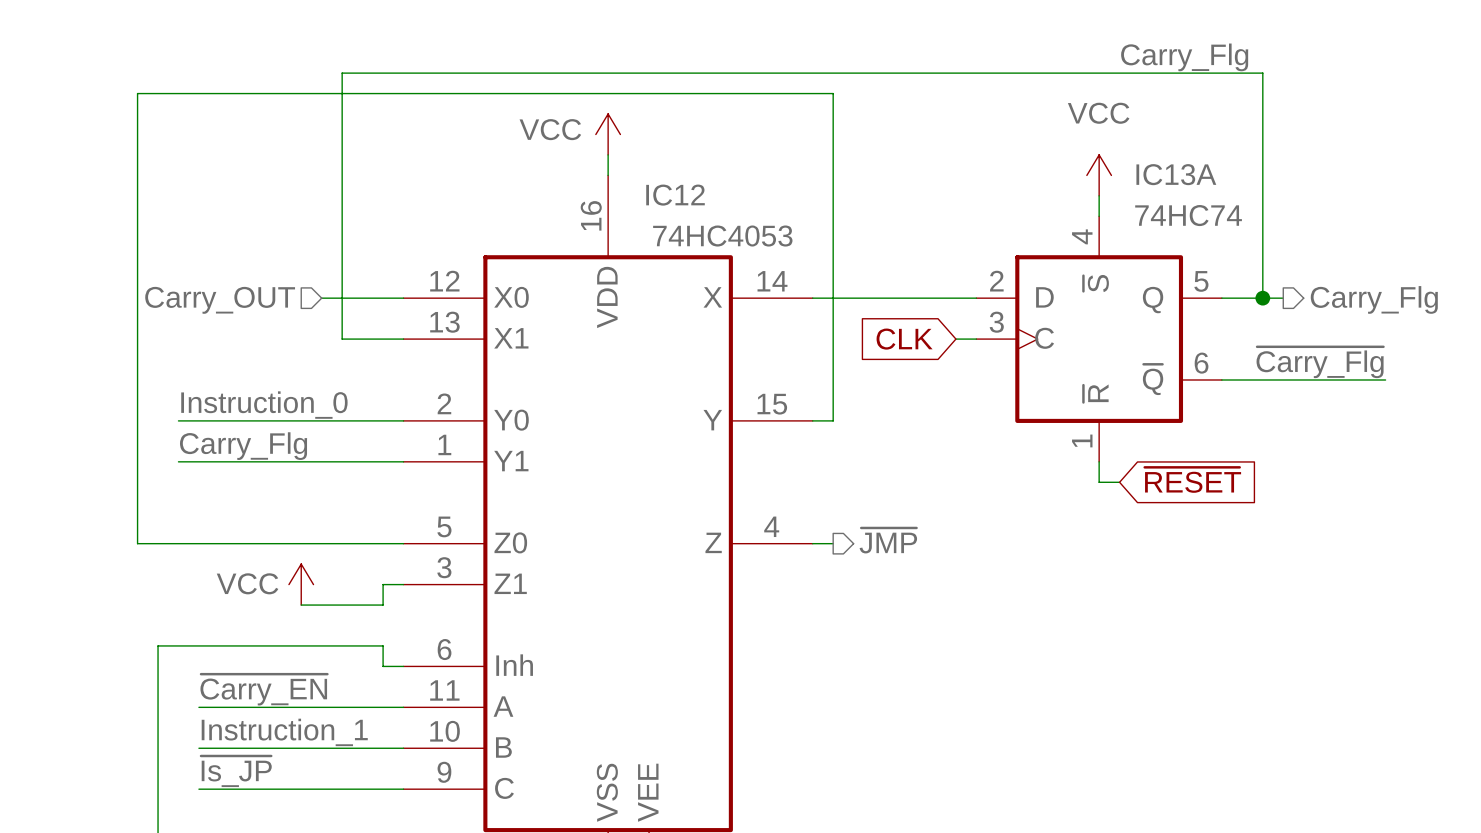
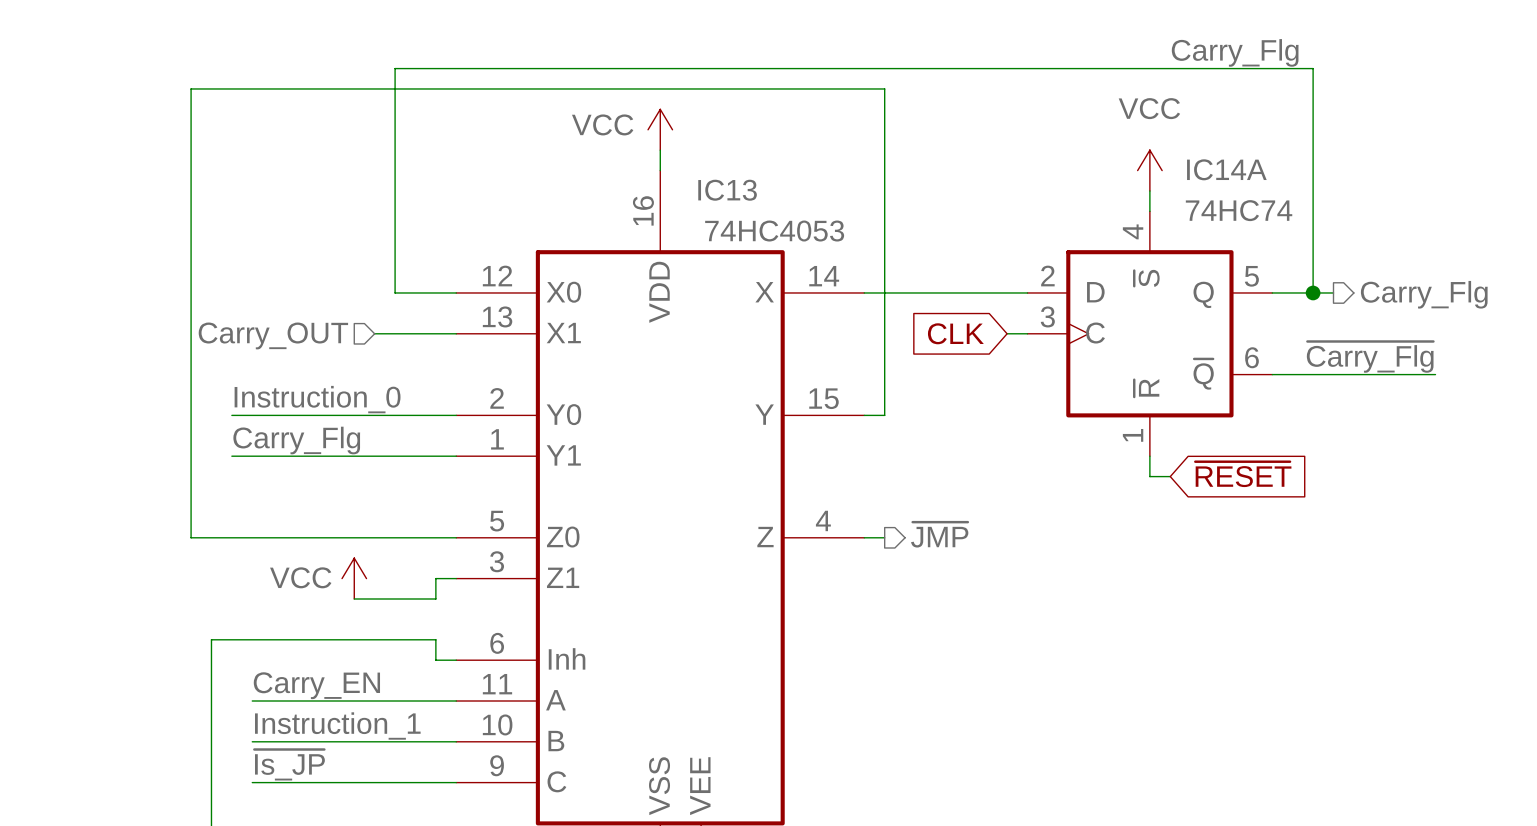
IC13A name: IC13A (1176, 174) -> IC14A (1226, 169)
IC12 name: IC12 (675, 195) -> IC13 (727, 190)
wire: (321, 298) (342, 298) (342, 339) -> (374, 333) (395, 333)
hierarchical label position: Carry_OUT (220, 300) -> Carry_OUT (273, 335)
label: ~{Carry_EN} (263, 689) -> Carry_EN (316, 685)

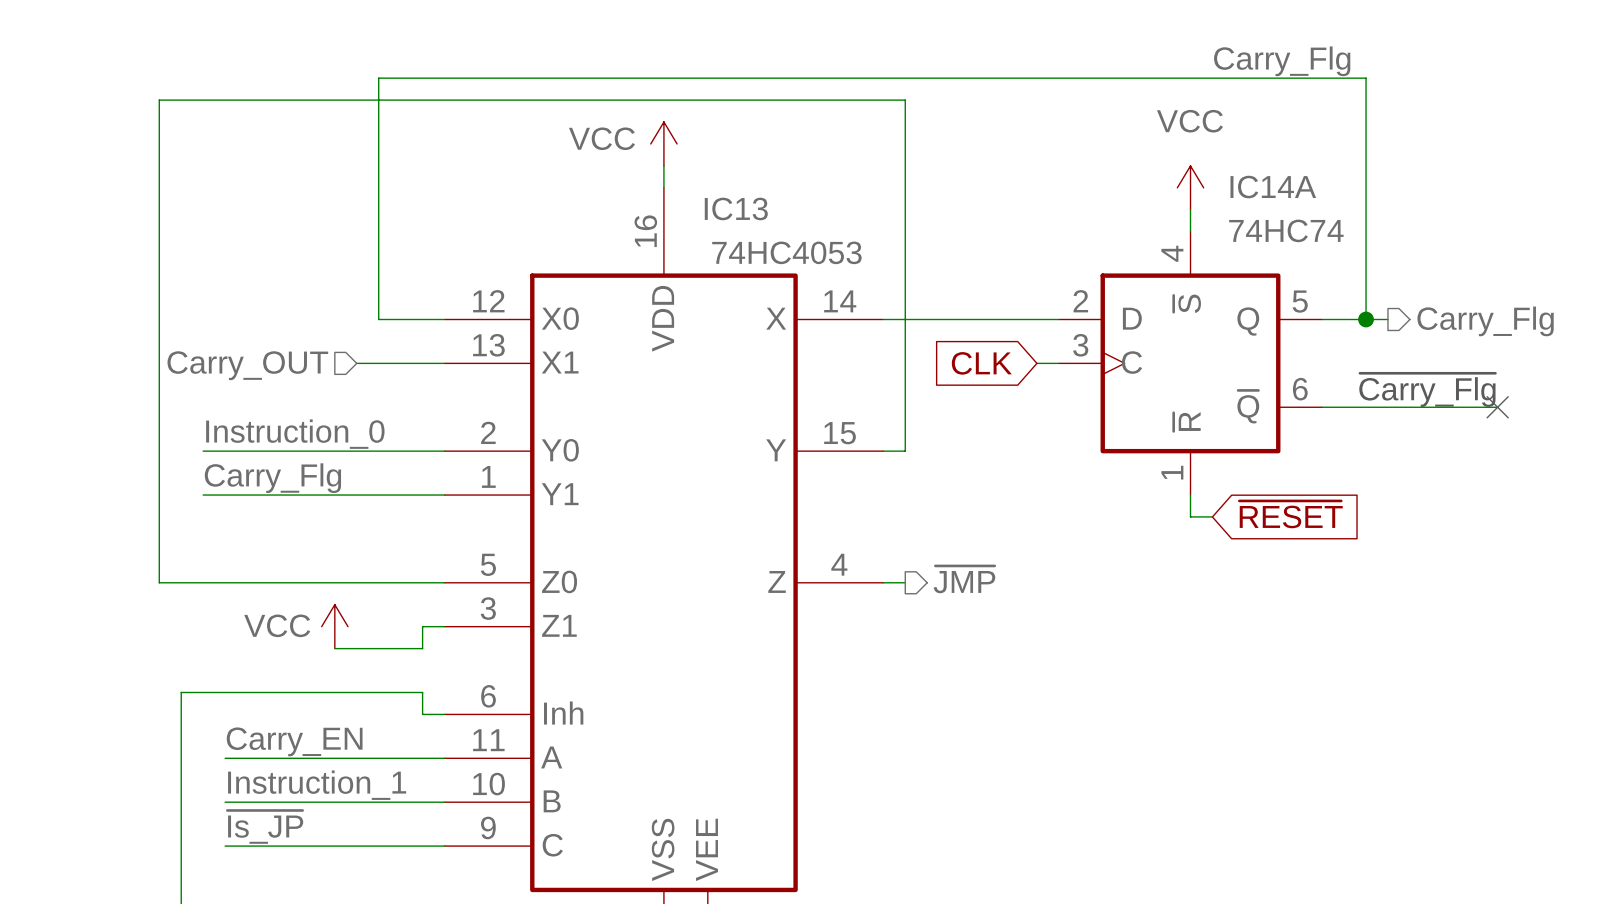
label: ~{Carry_Flg} (1370, 357) -> none
text: none -> ~{Carry_Flg} (1427, 390)
no-connect mark: none -> (1497, 407)

